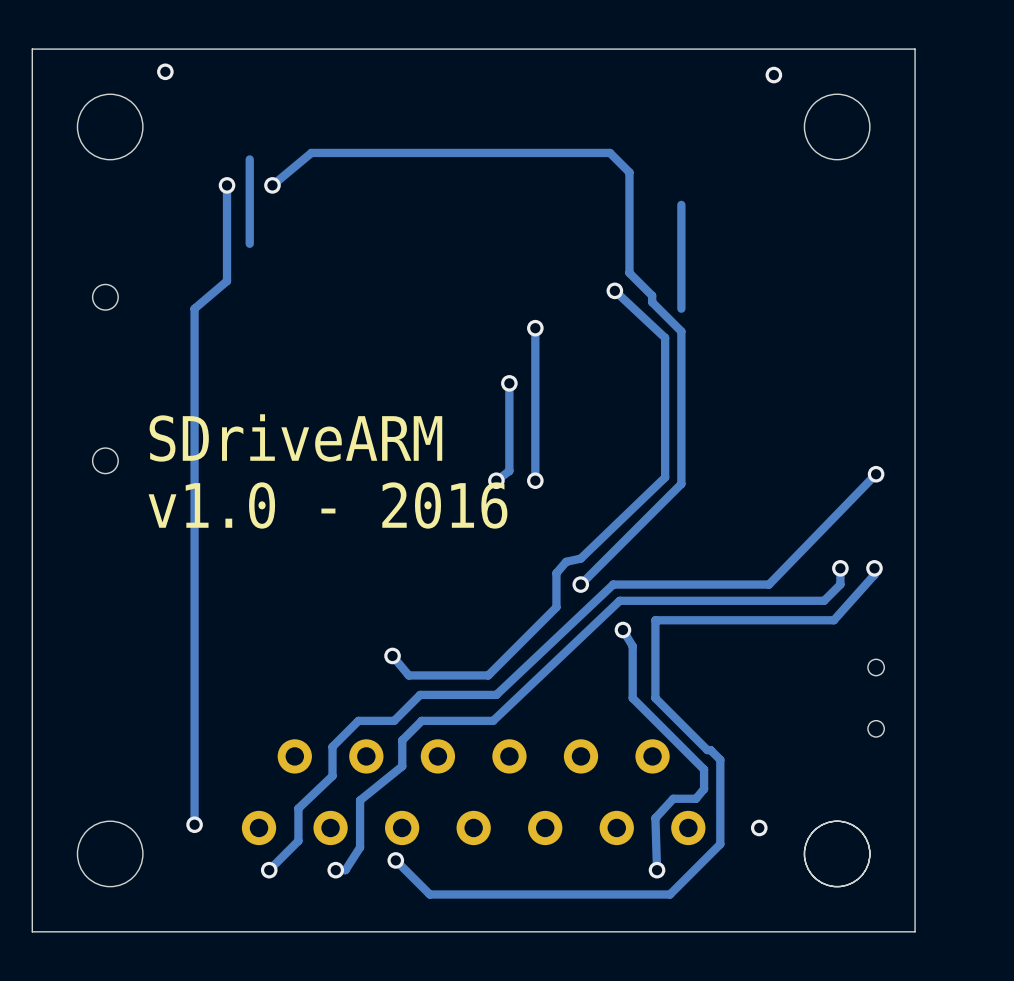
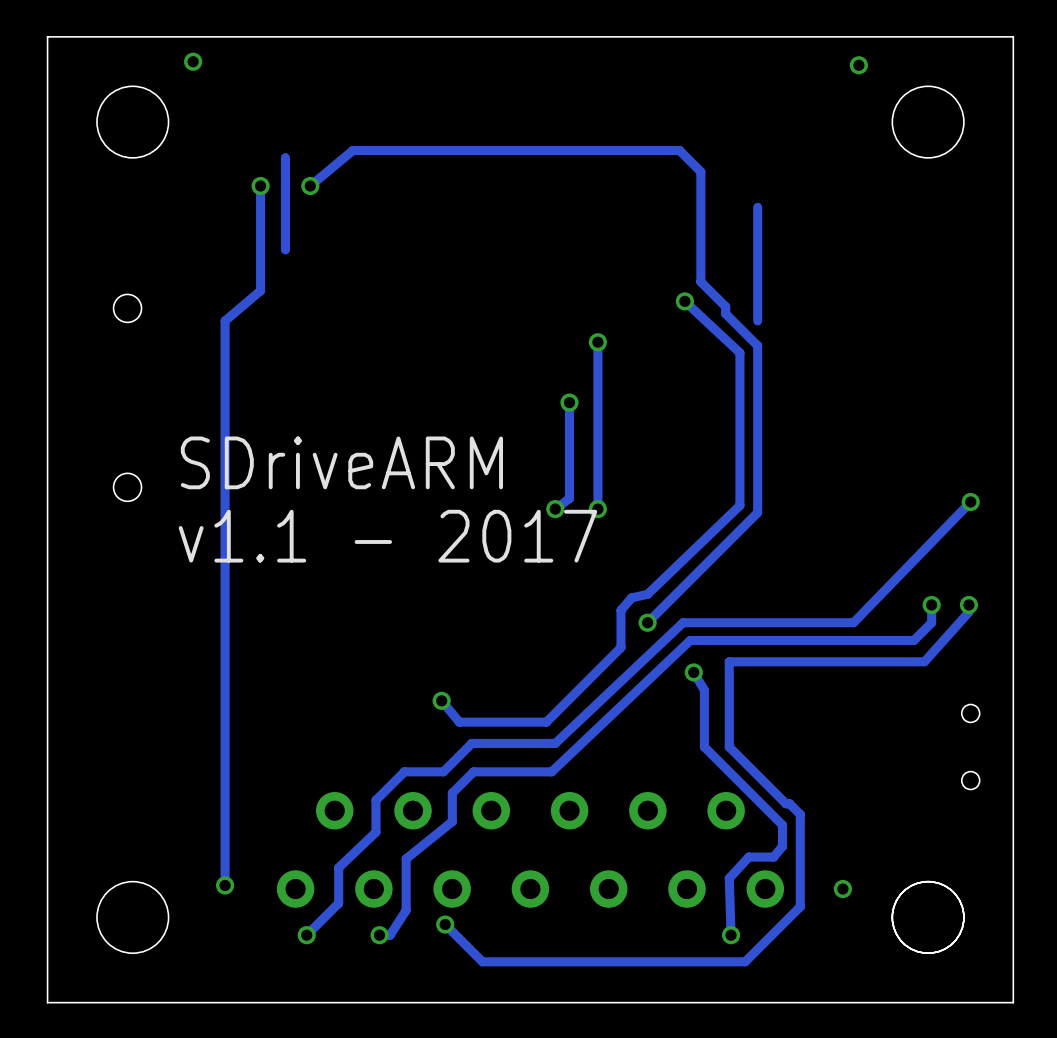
text: v1.0 - 2016 (327, 505) -> v1.1 - 2017 (387, 536)

